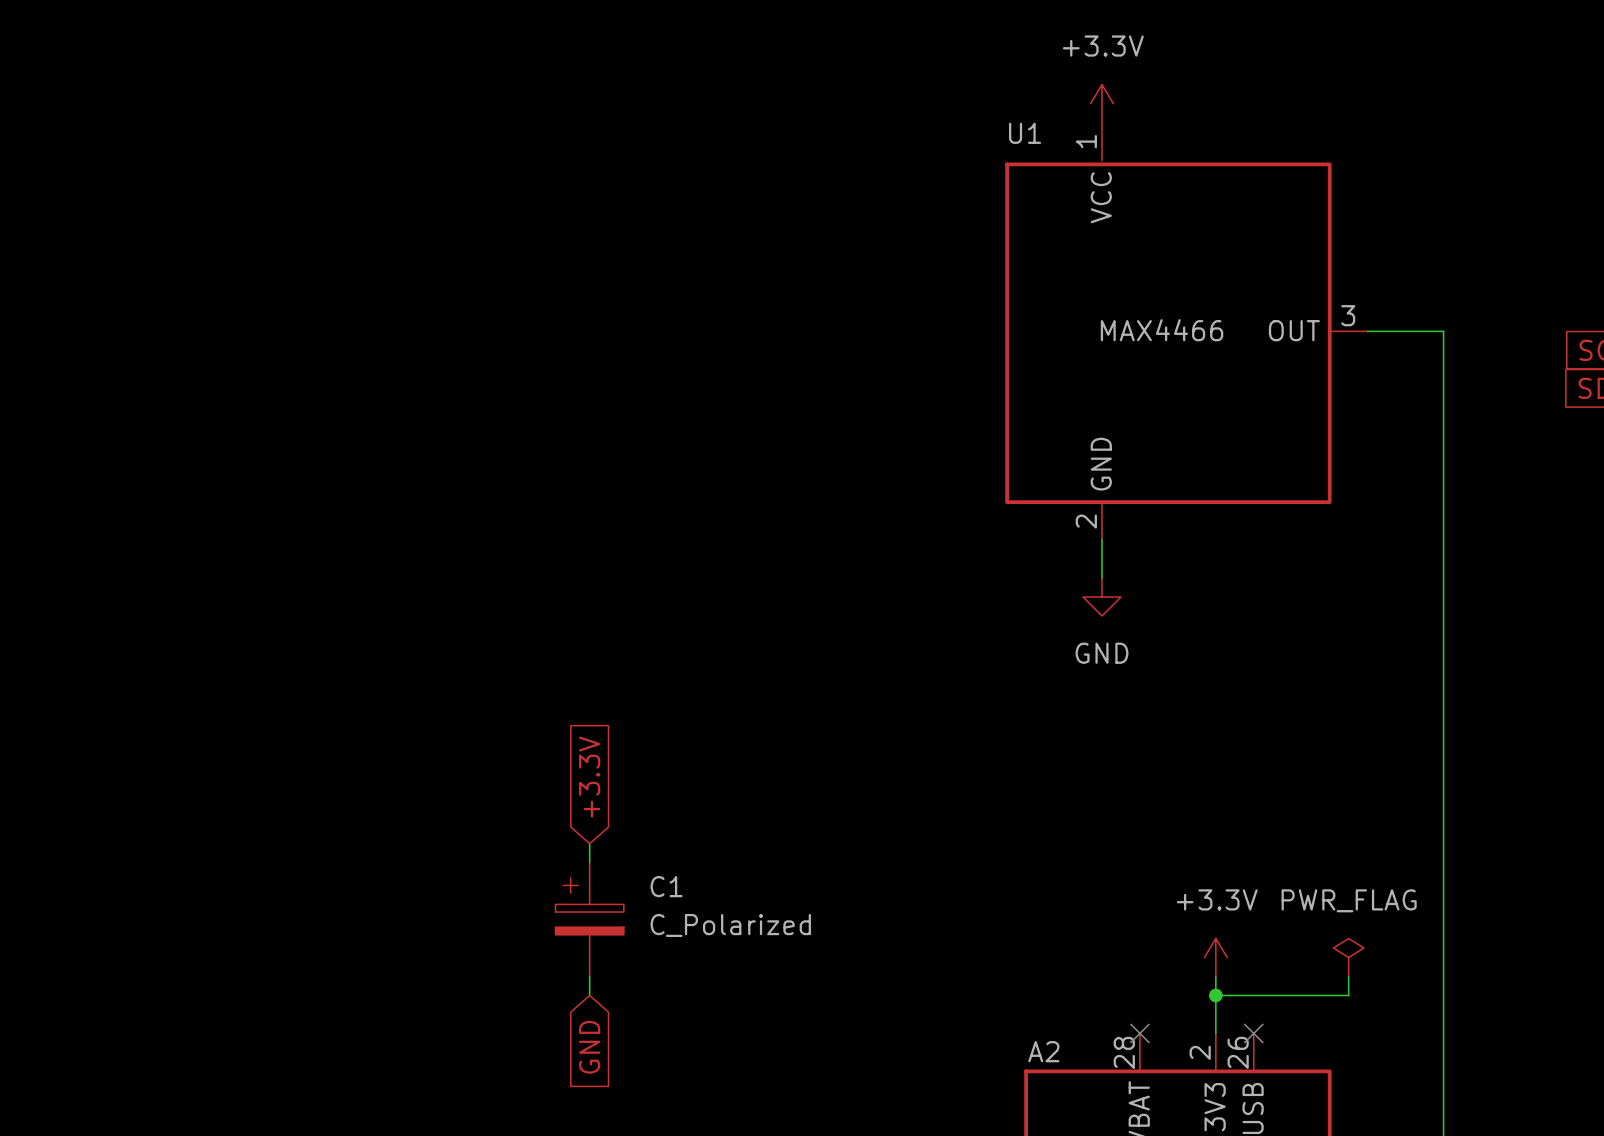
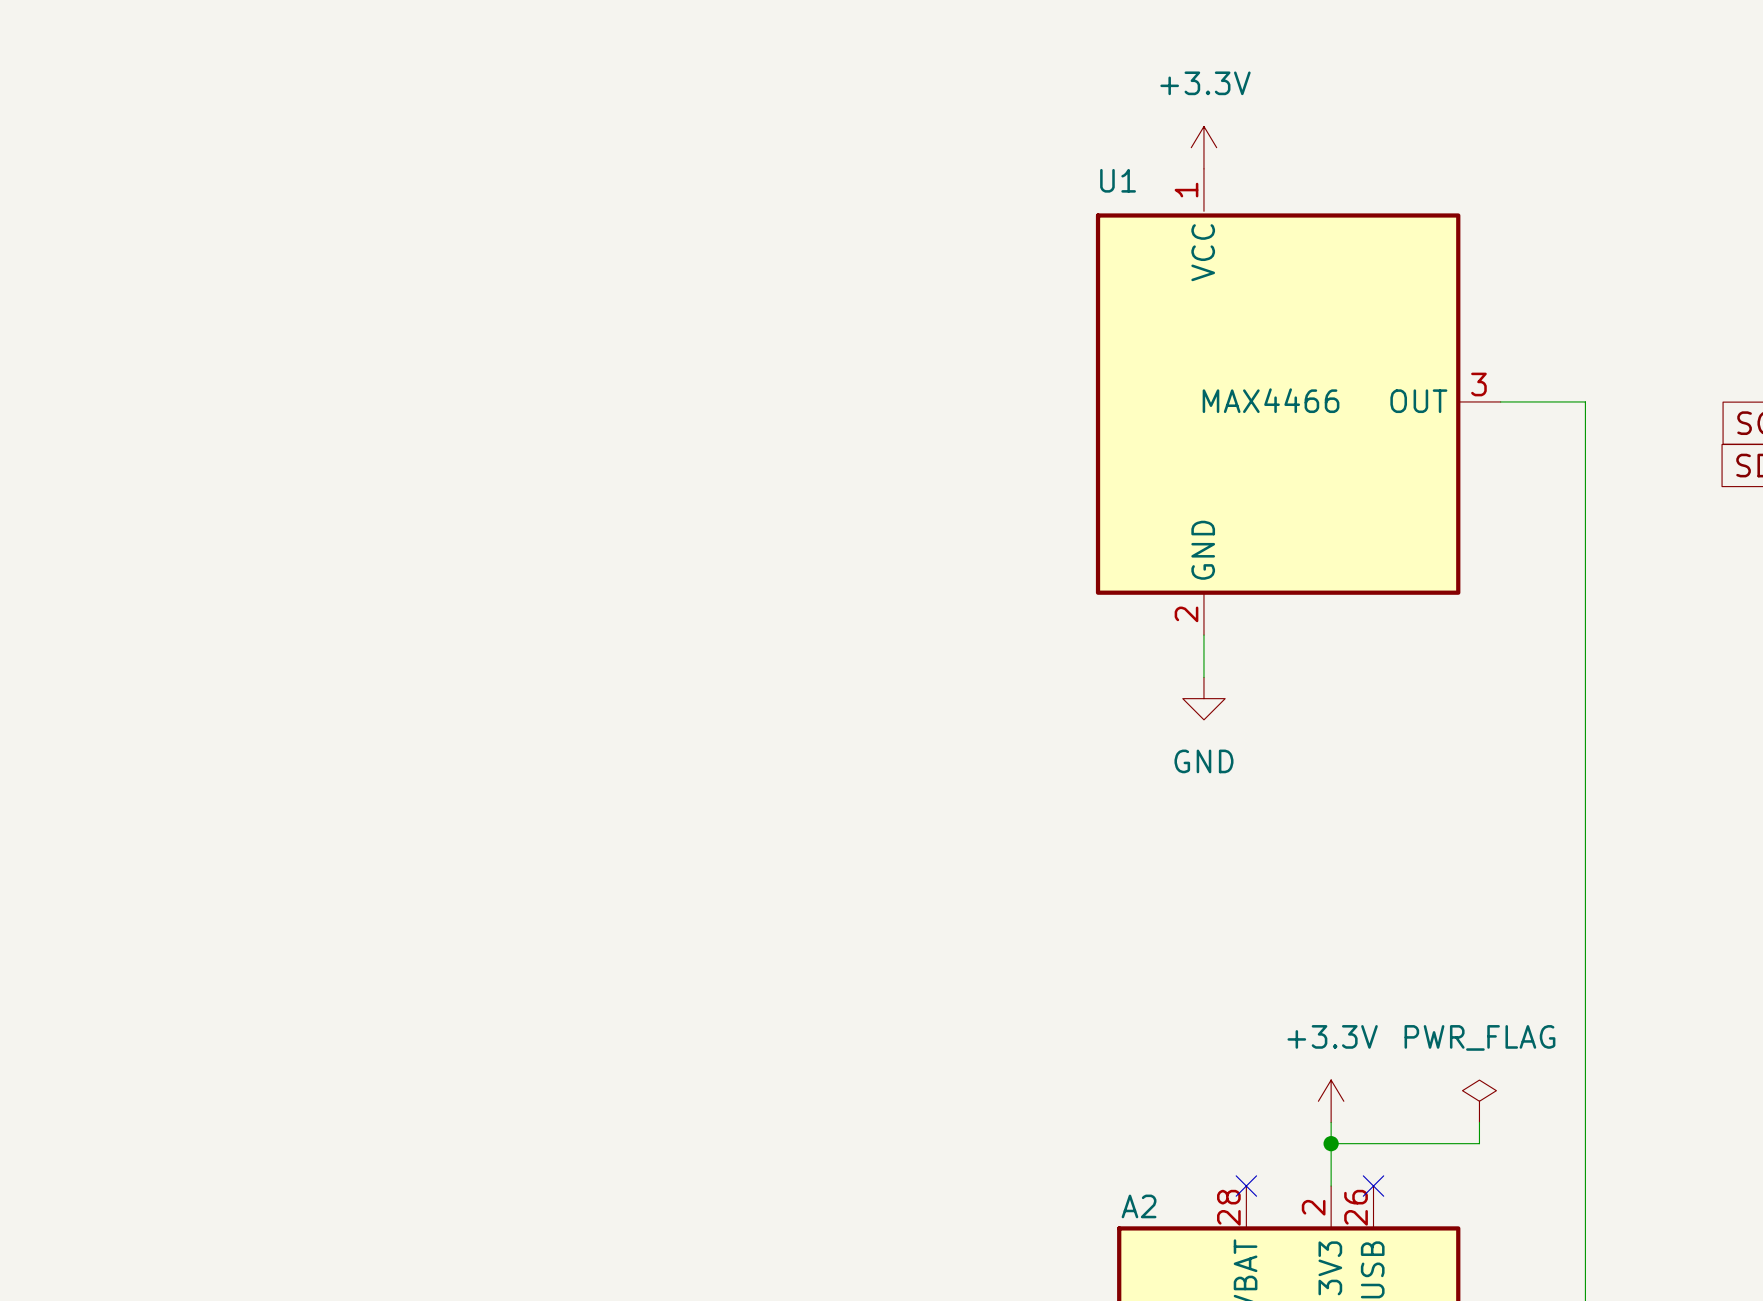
global label: +3.3V (589, 777) -> none
wire: (589, 843) (589, 862) -> none
C1: C_Polarized (589, 919) -> none
wire: (589, 976) (589, 995) -> none
global label: GND (589, 1047) -> none

